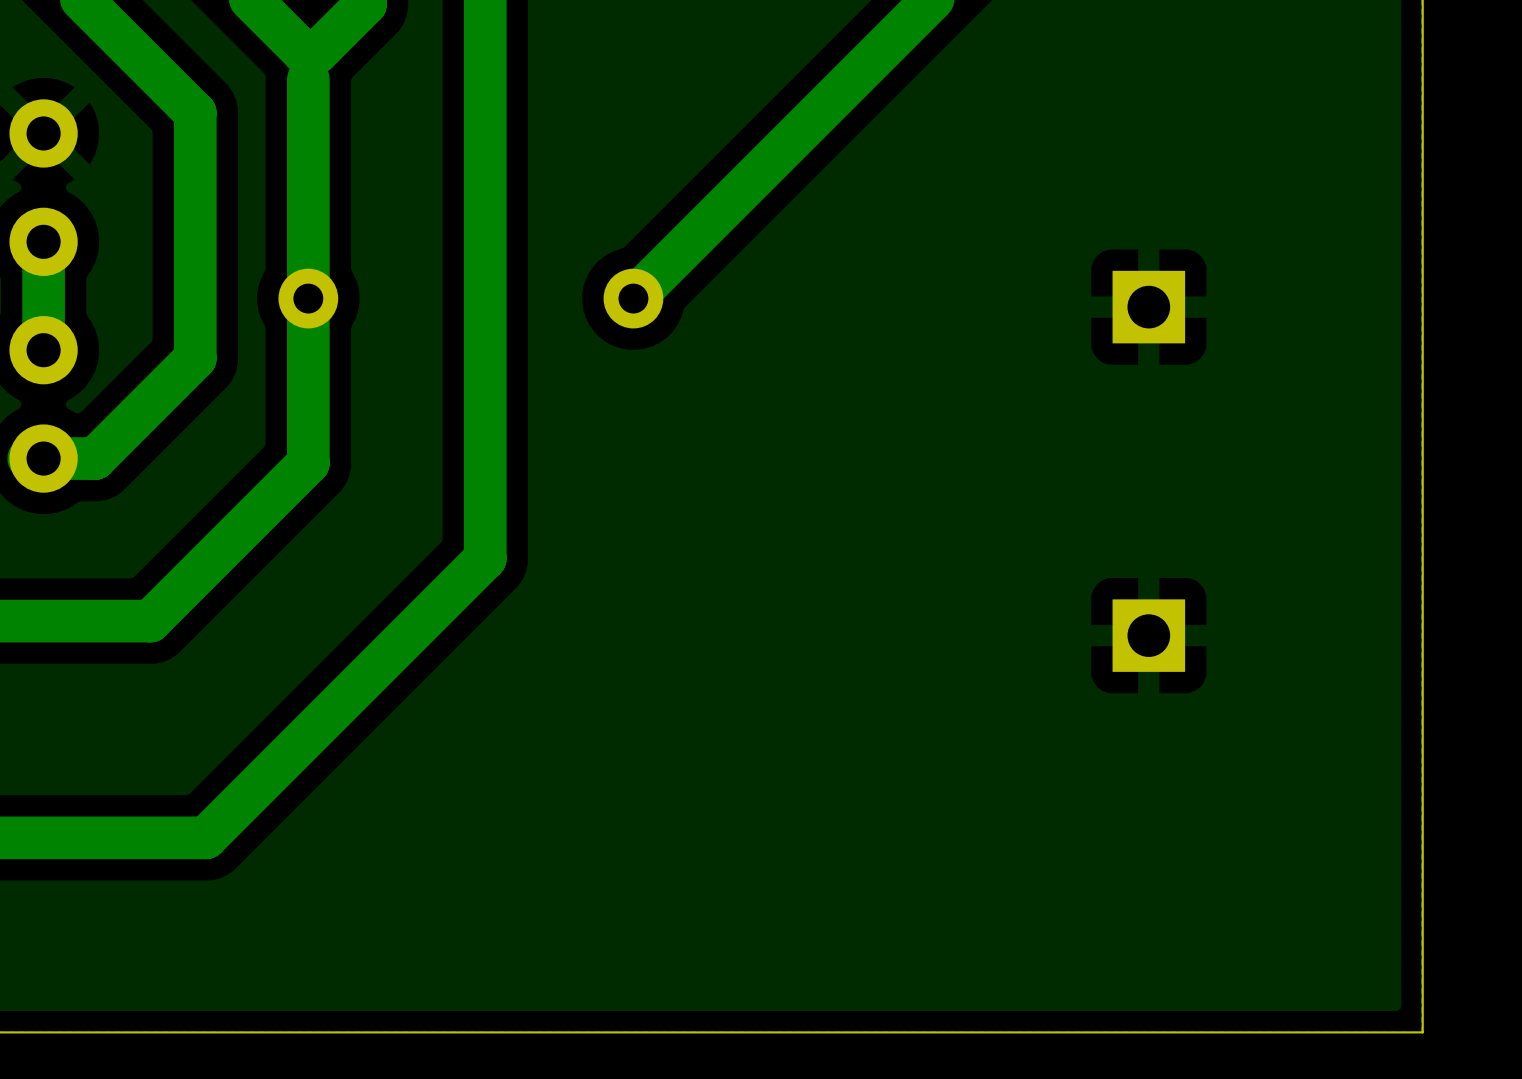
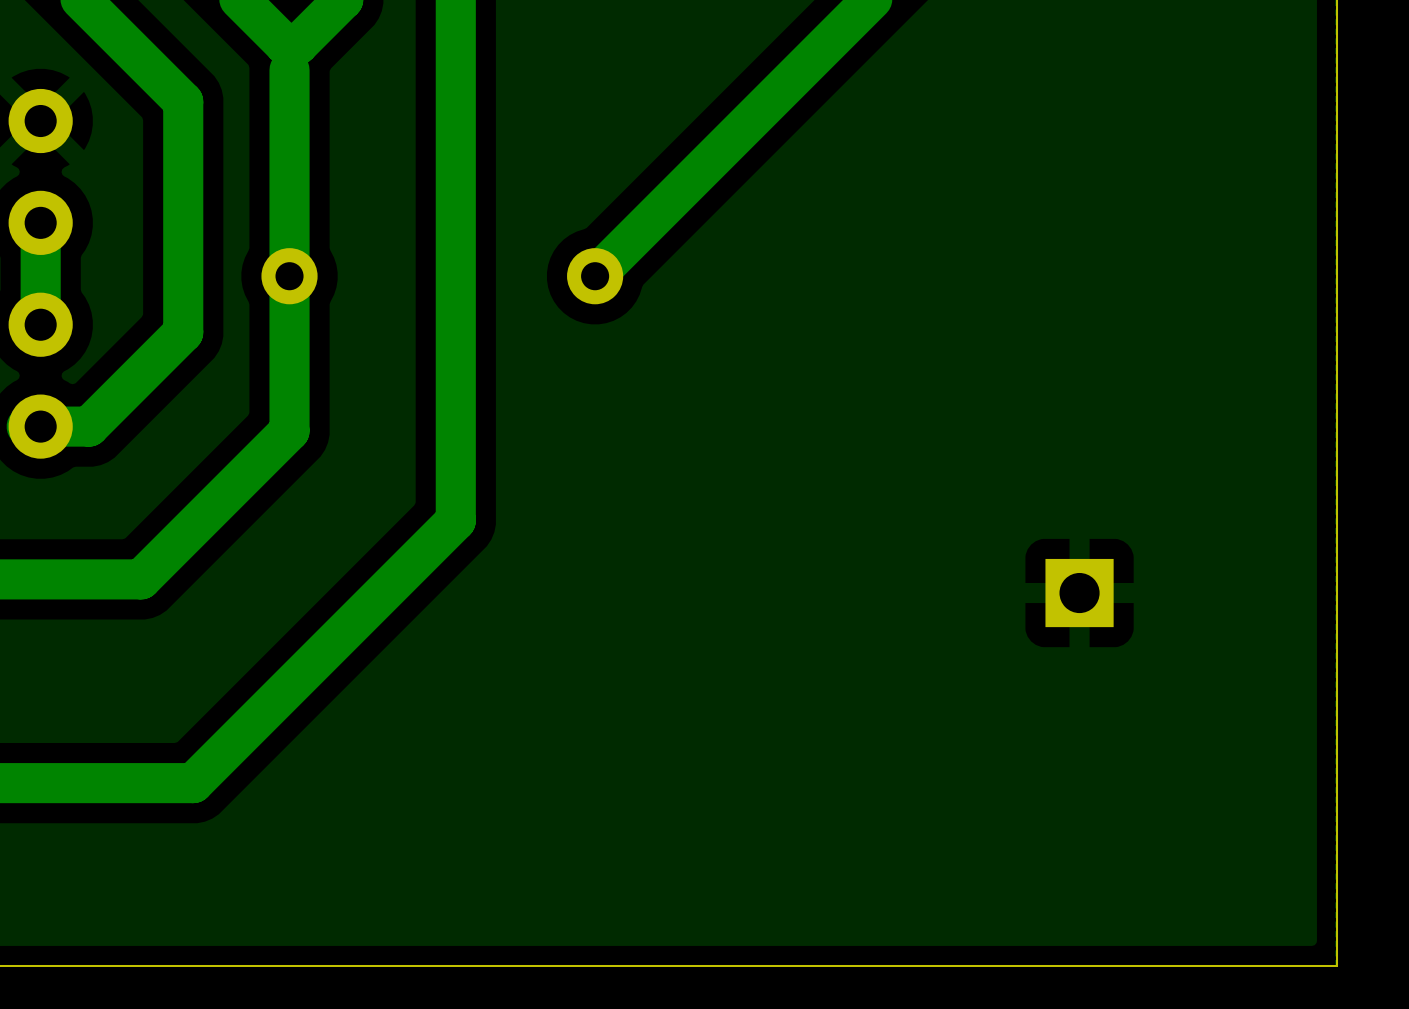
part: (1148, 307) -> none

